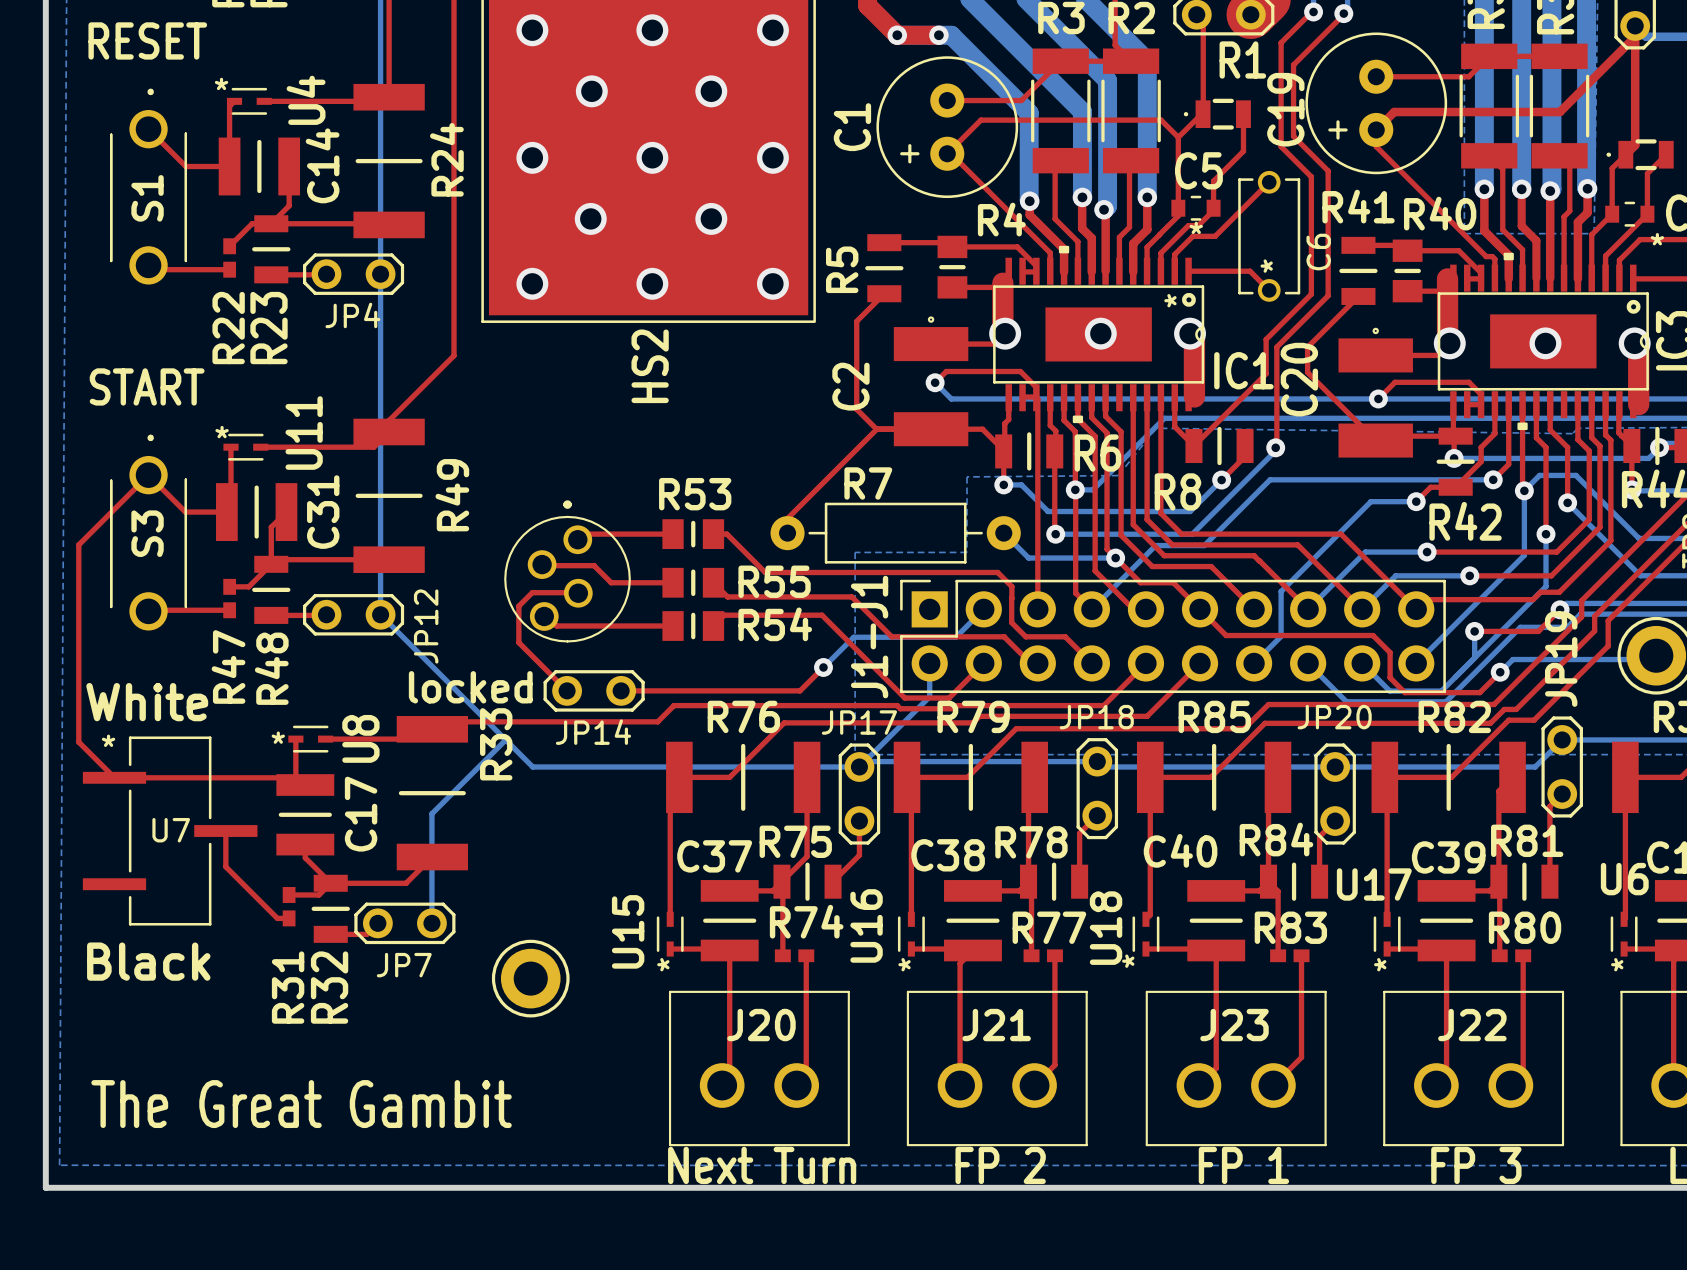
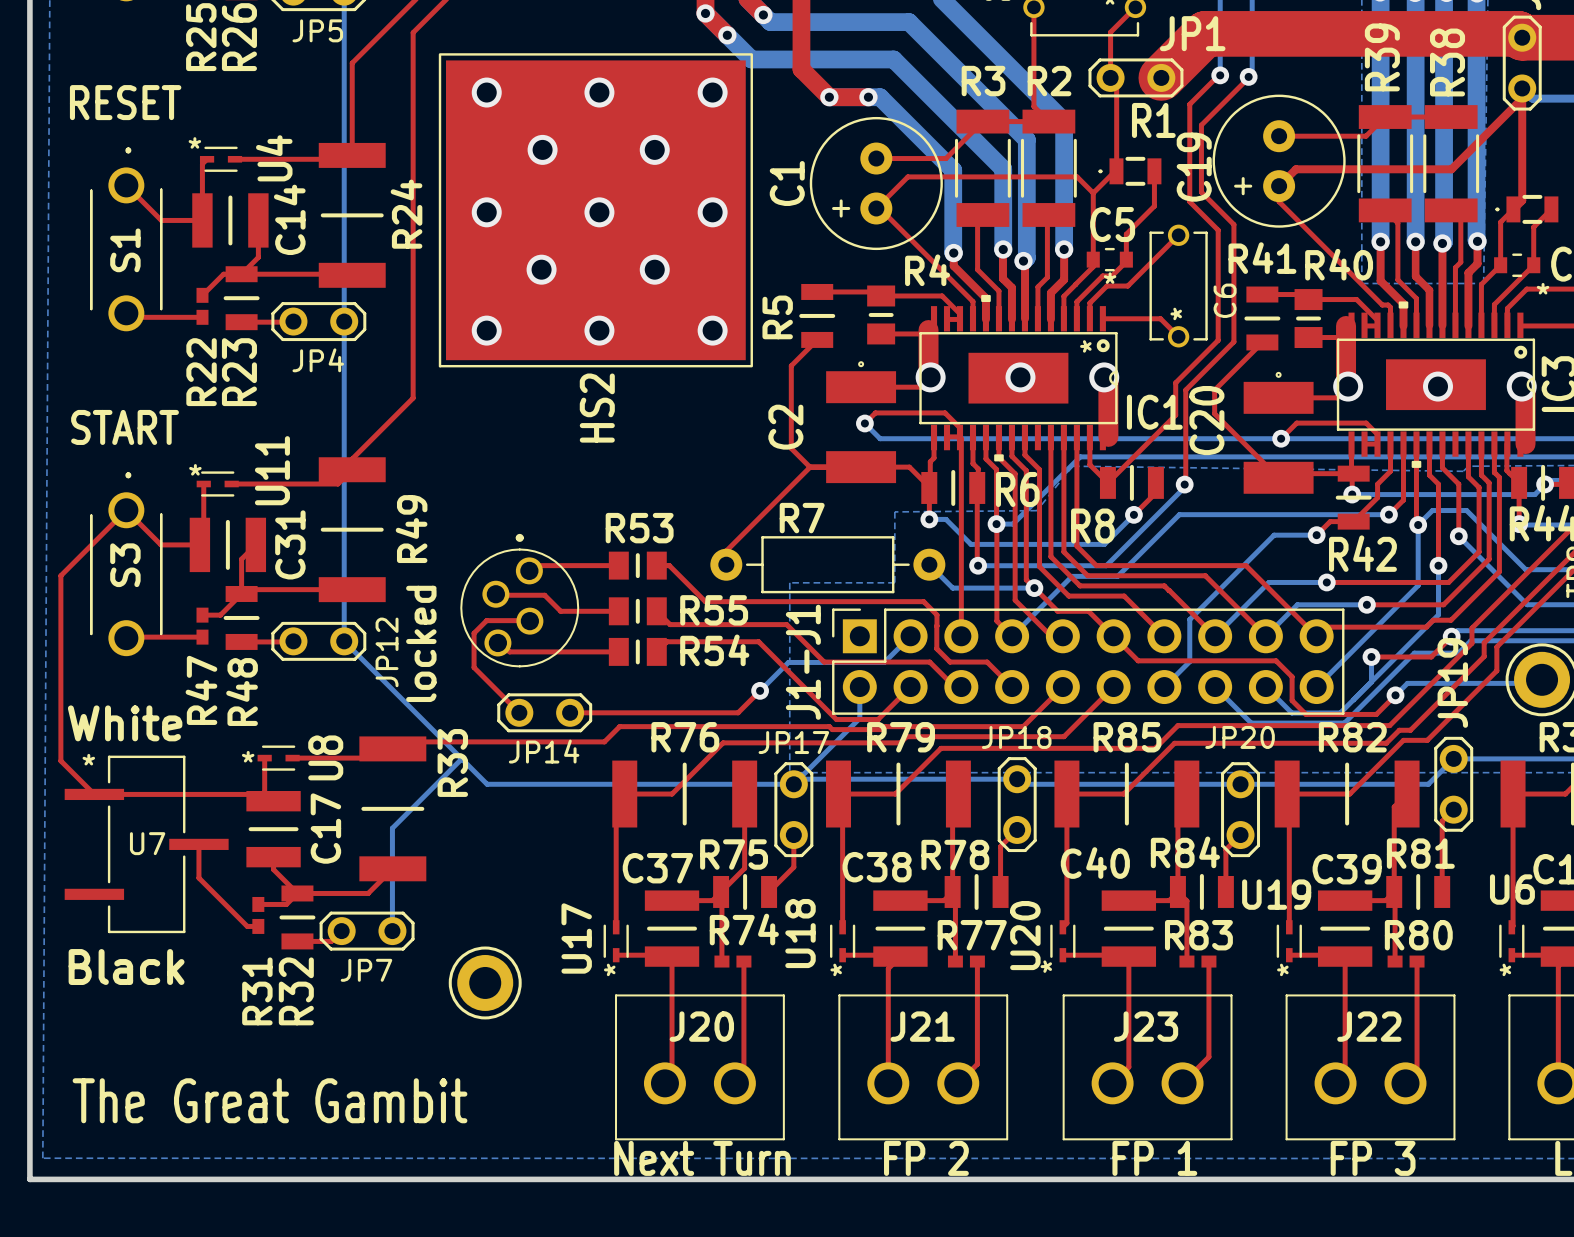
locked name rotation: 0° (470, 687) -> 90° counterclockwise (421, 643)
U17 name: U17 (1374, 884) -> U19 (1276, 894)
U16 name: U16 (866, 925) -> U18 (800, 933)
U18 name: U18 (1106, 928) -> U20 (1025, 935)
U15 name: U15 (628, 931) -> U17 (576, 938)

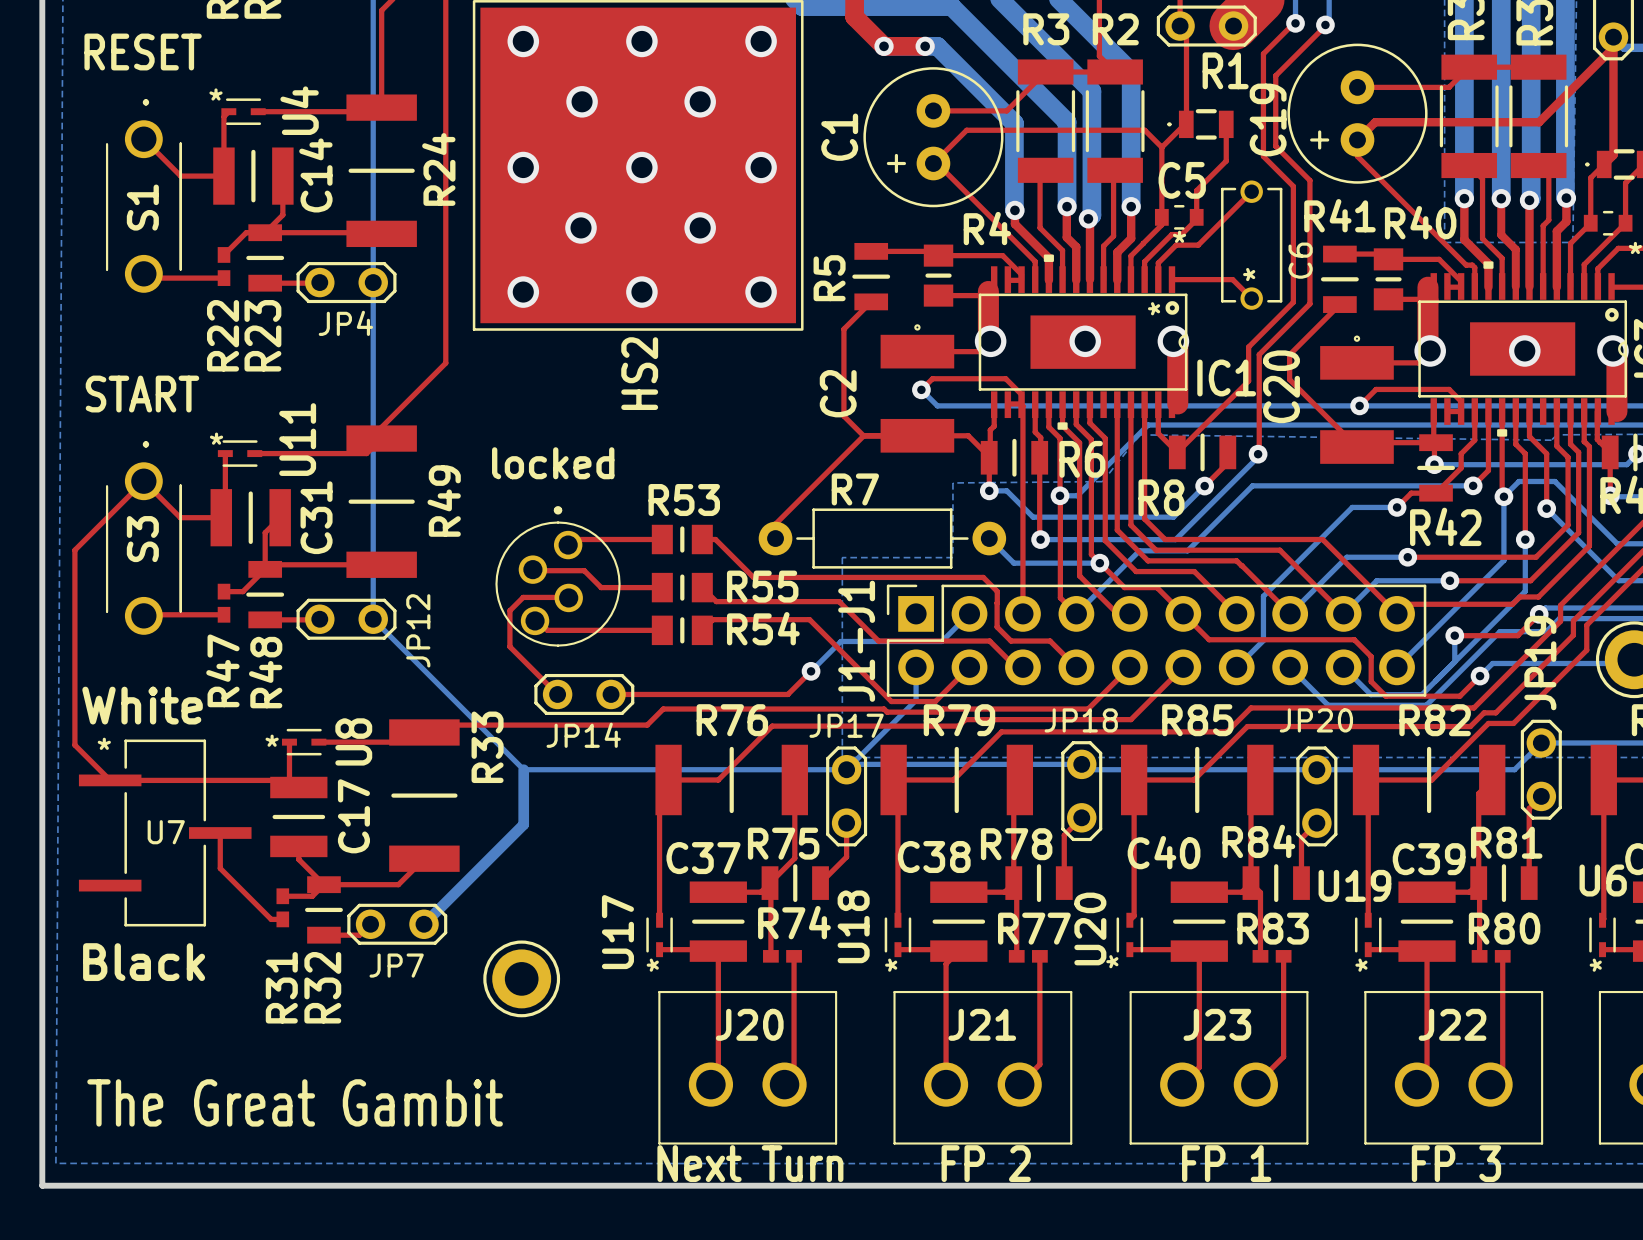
locked name rotation: 0° (421, 643) -> 90° clockwise (553, 463)
locked name position: locked (421, 643) -> locked (553, 463)
bottom track: (461, 758) (392, 828) (392, 931) -> (523, 769) (523, 824) (424, 924)

